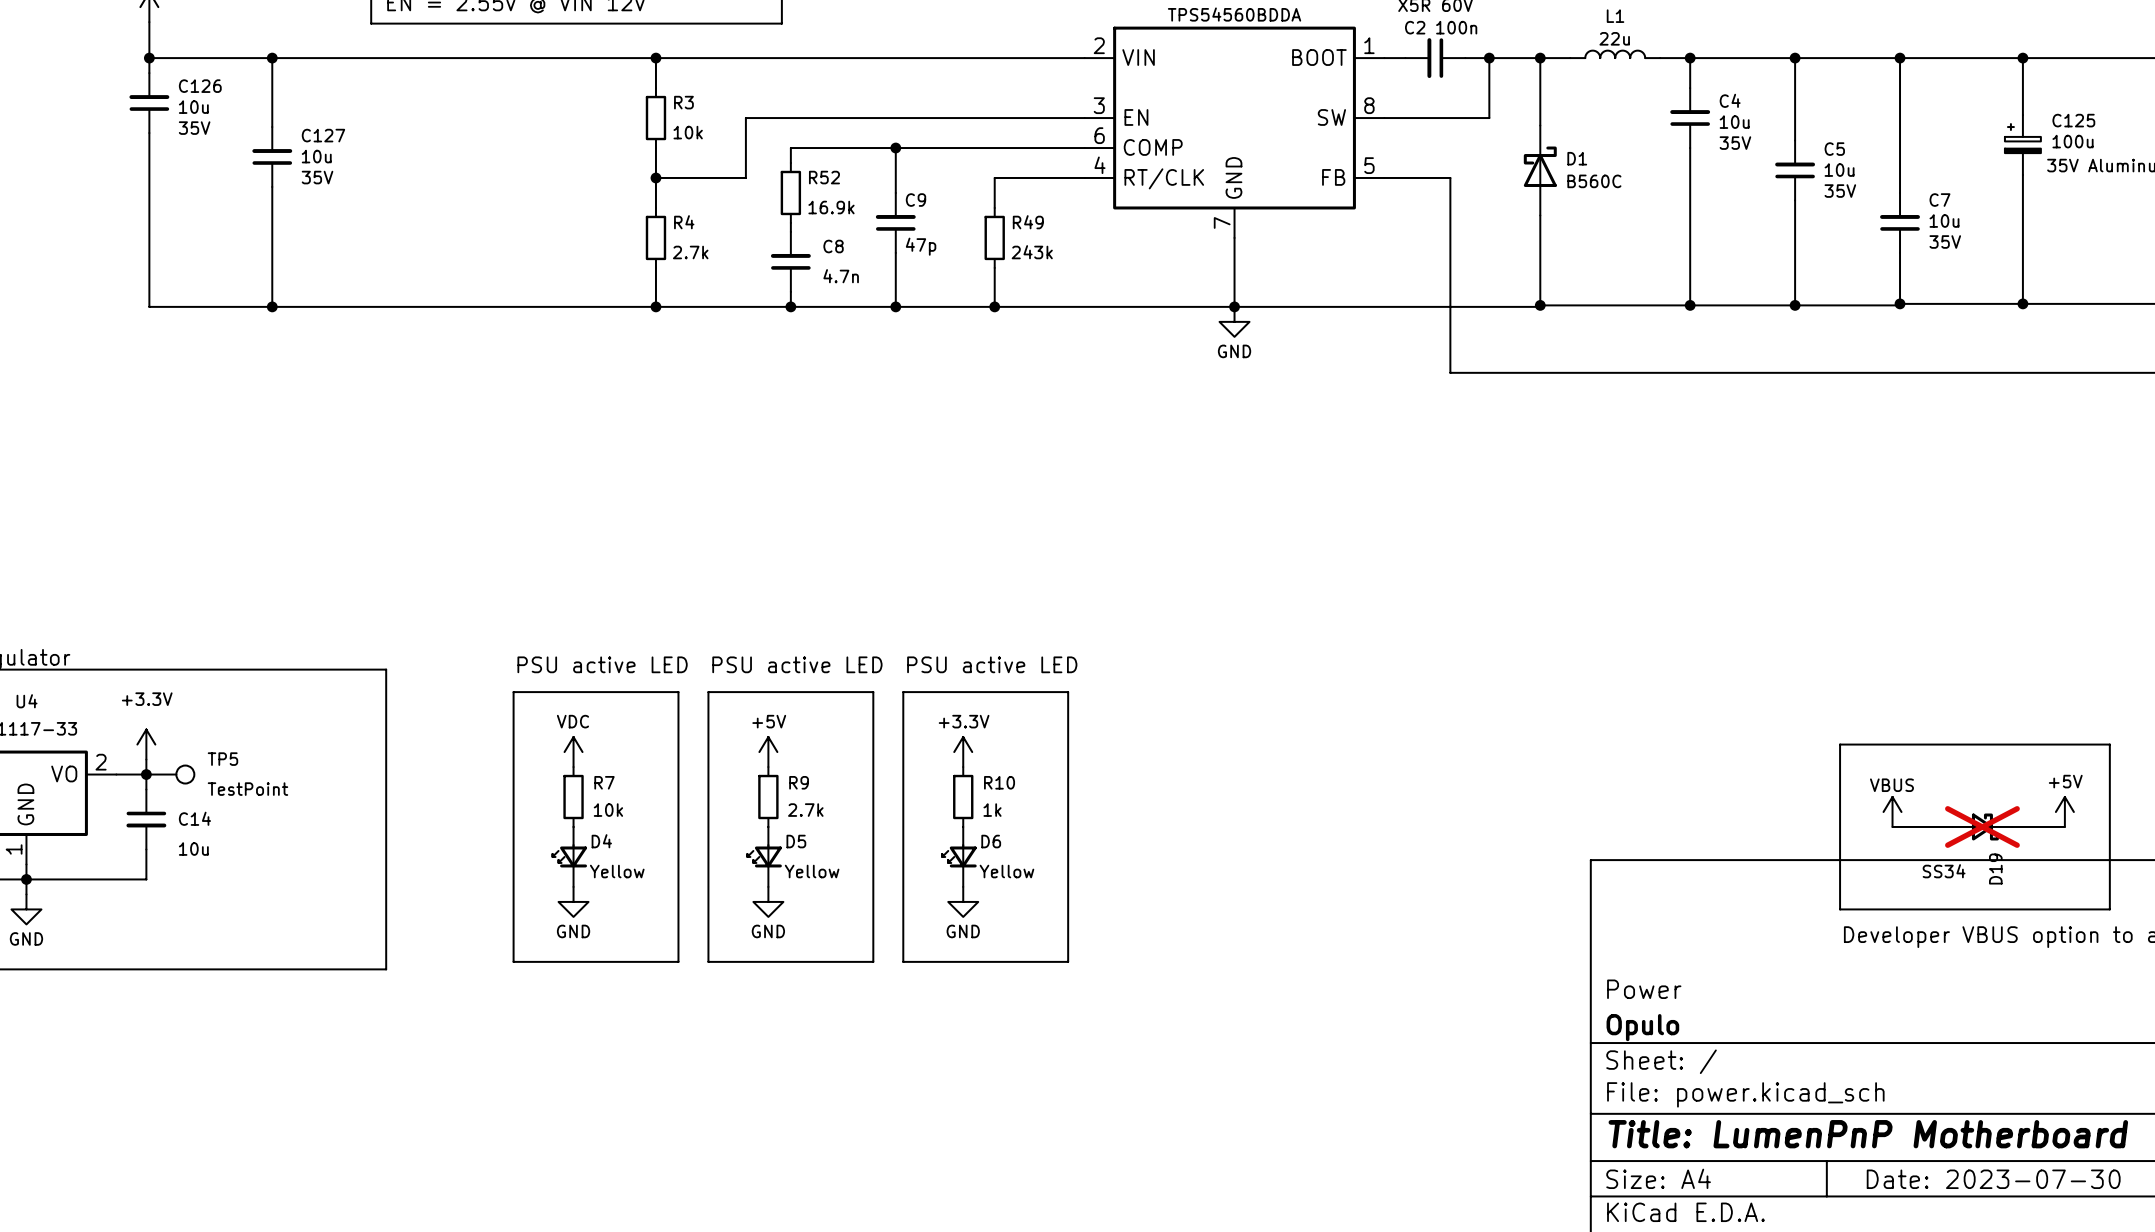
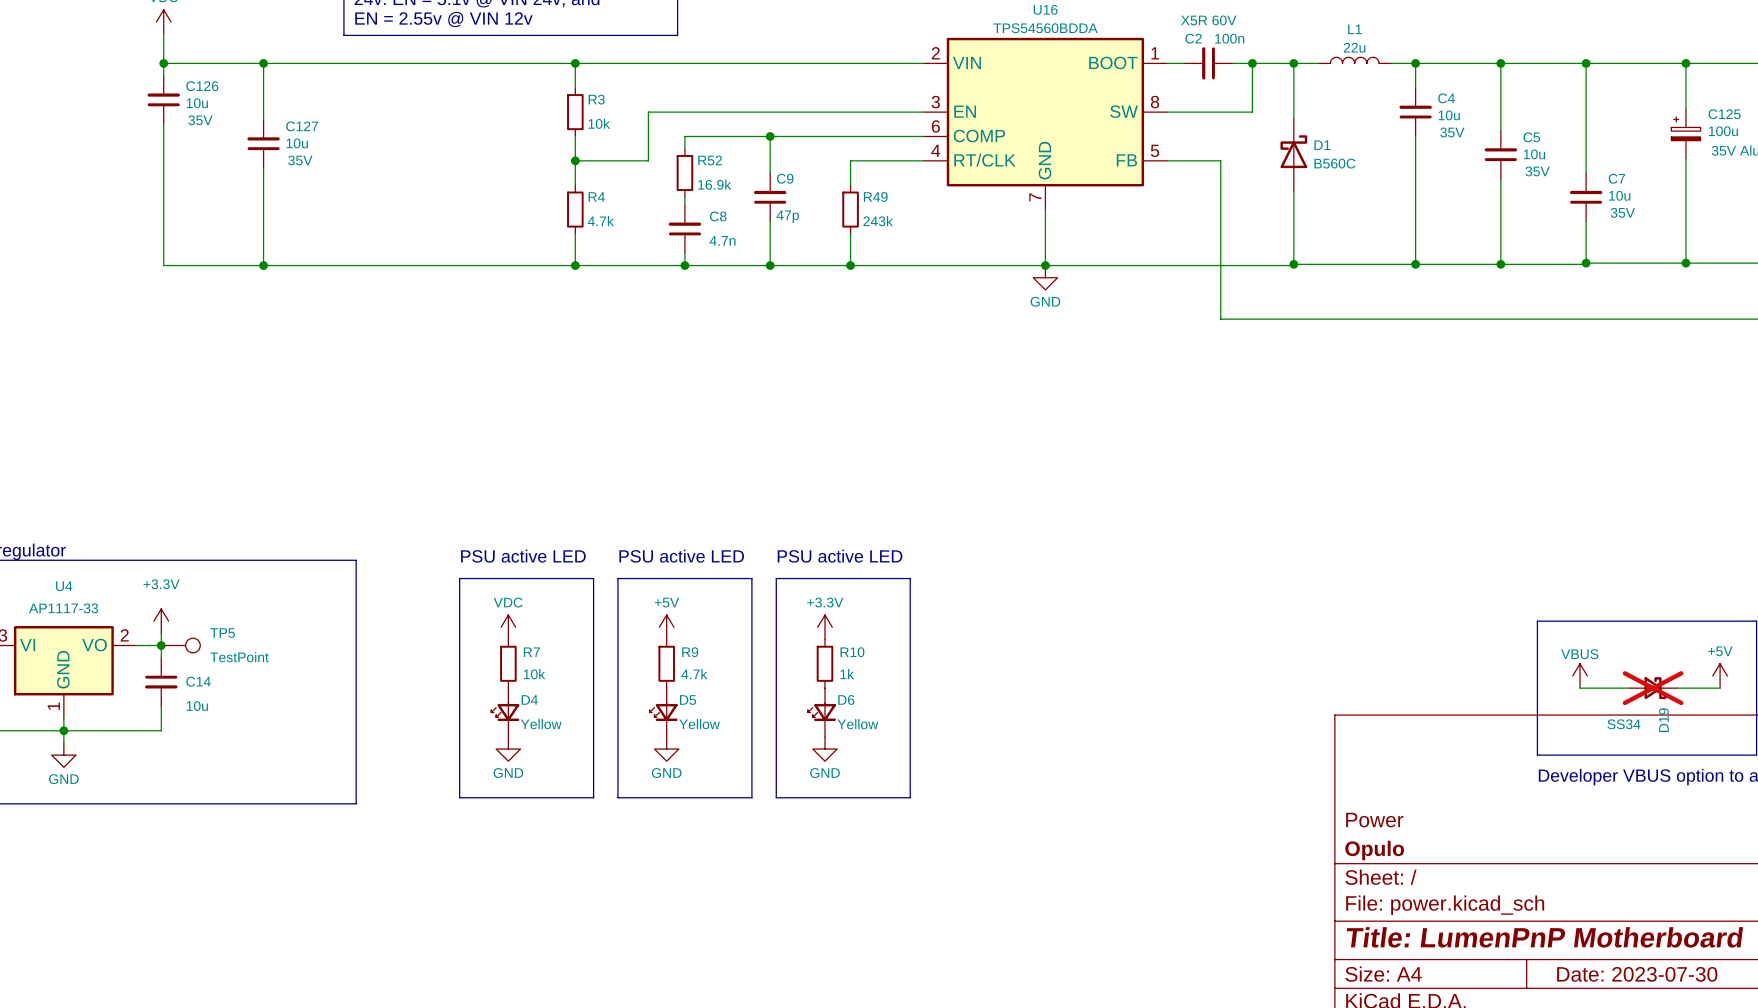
R4 value: 2.7k (690, 252) -> 4.7k (600, 221)
R9 value: 2.7k (805, 810) -> 4.7k (694, 674)

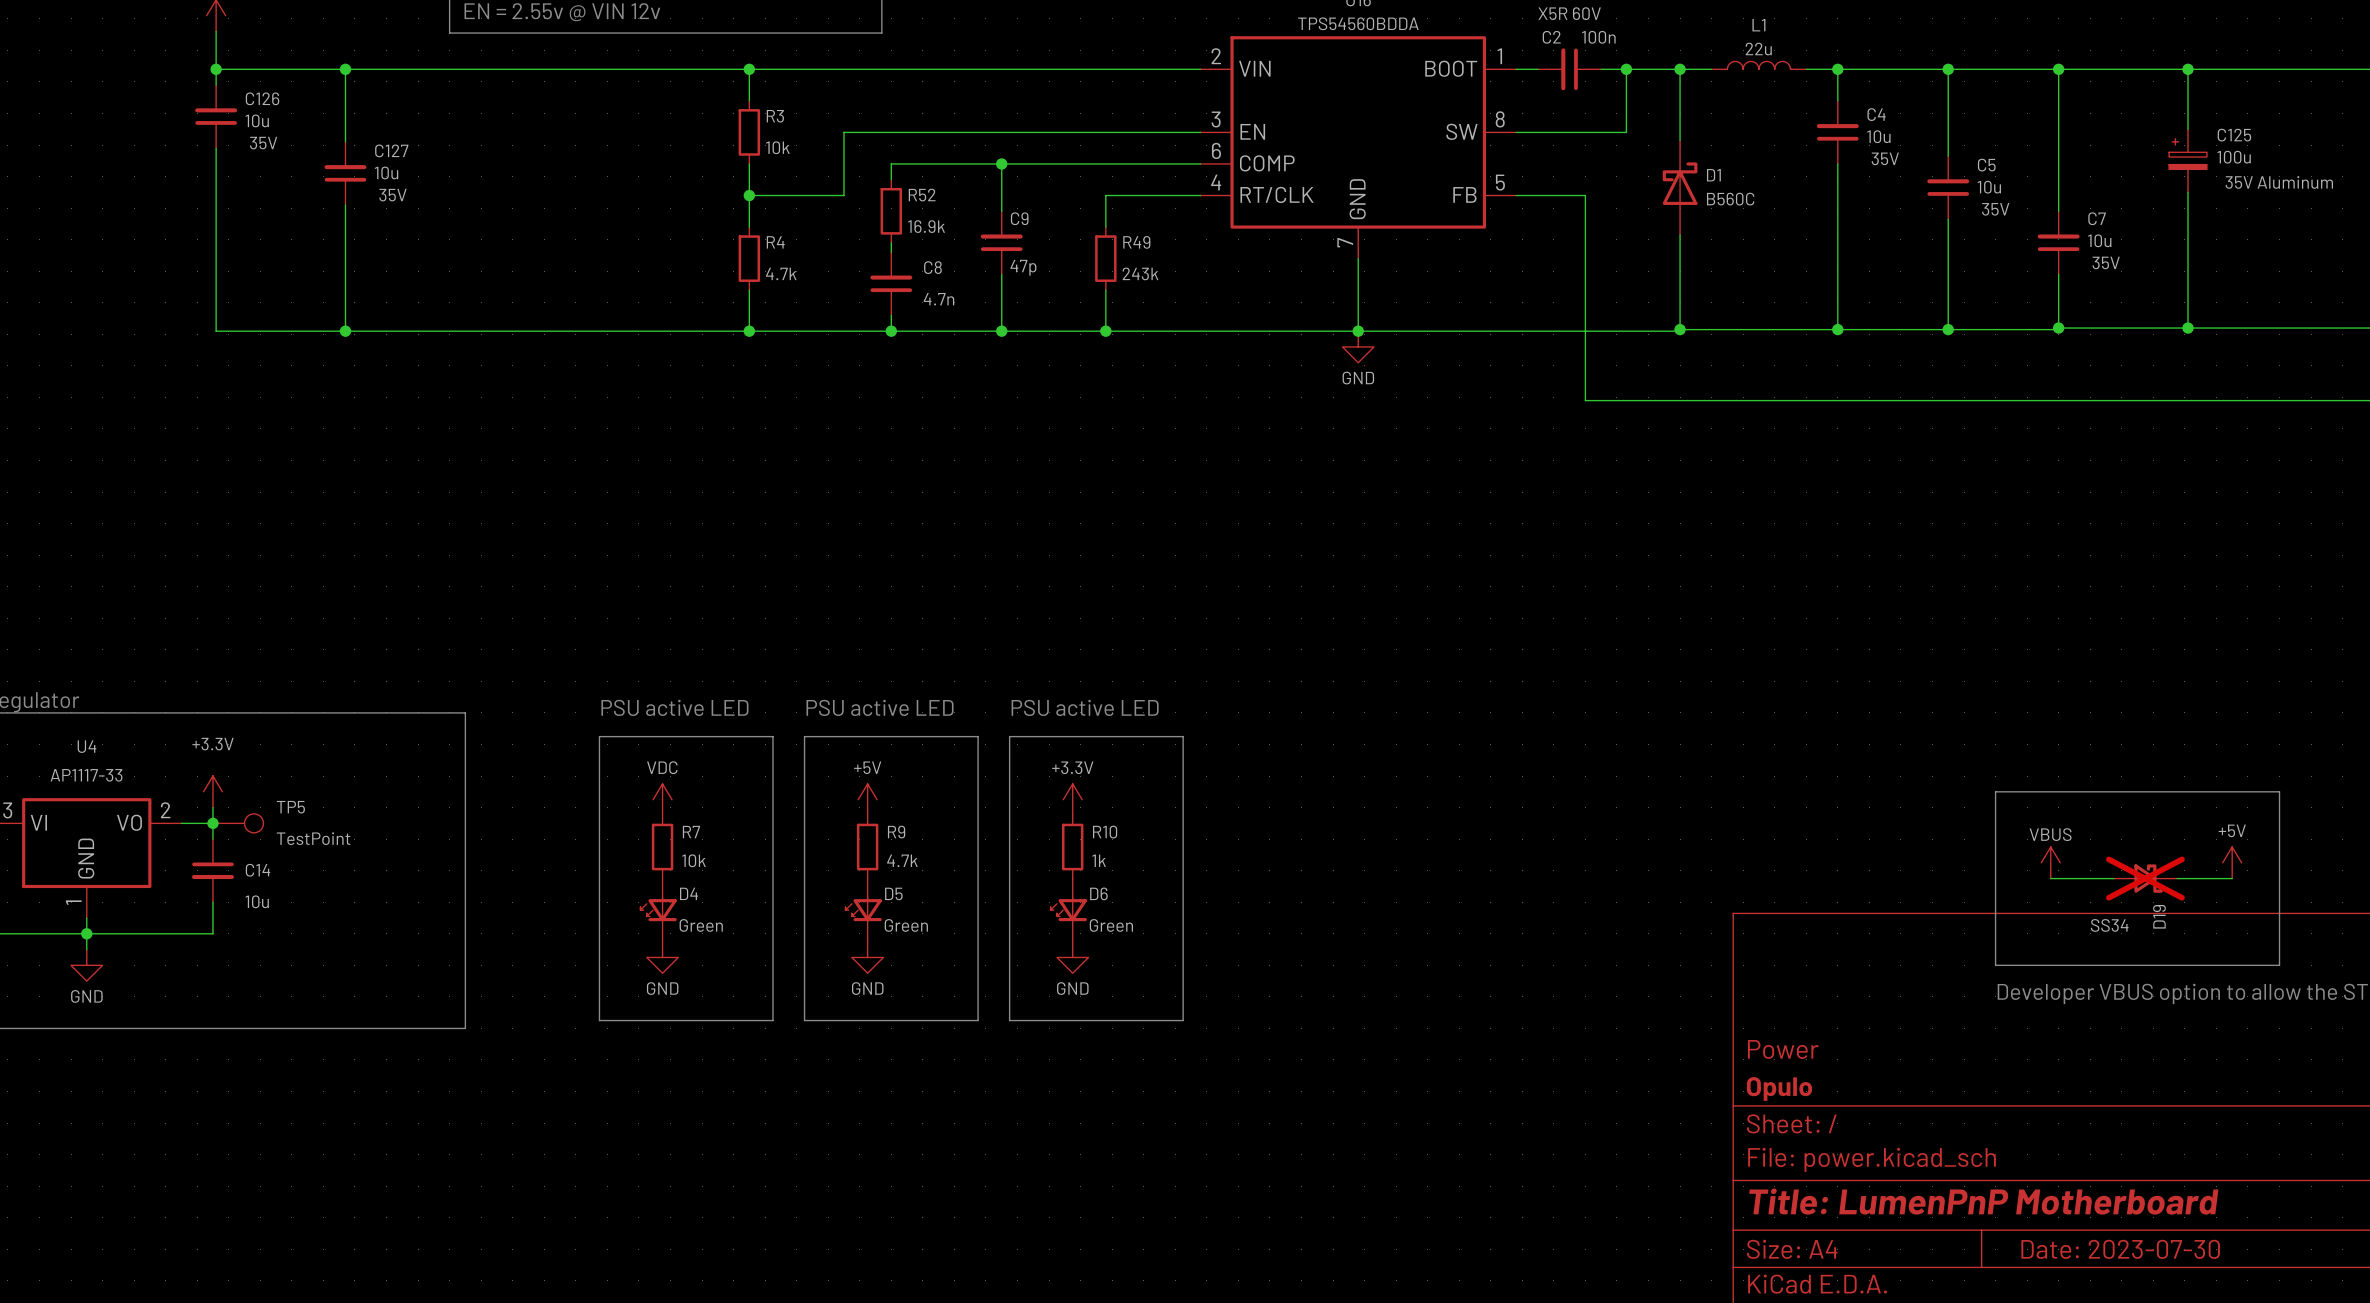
D4 value: Yellow (541, 724) -> Green (701, 925)
D5 value: Yellow (699, 724) -> Green (906, 925)
D6 value: Yellow (857, 724) -> Green (1111, 925)

